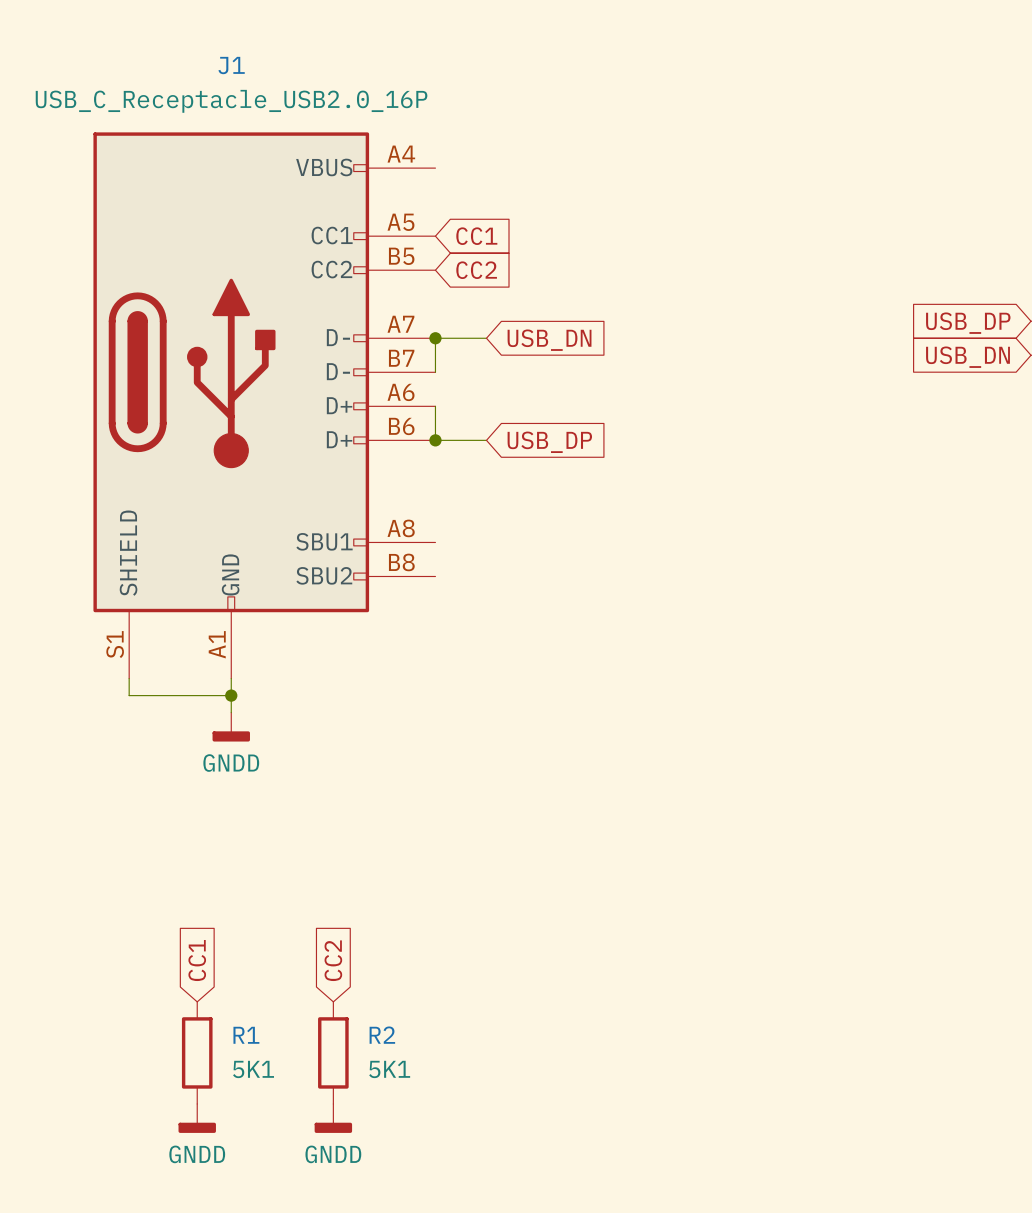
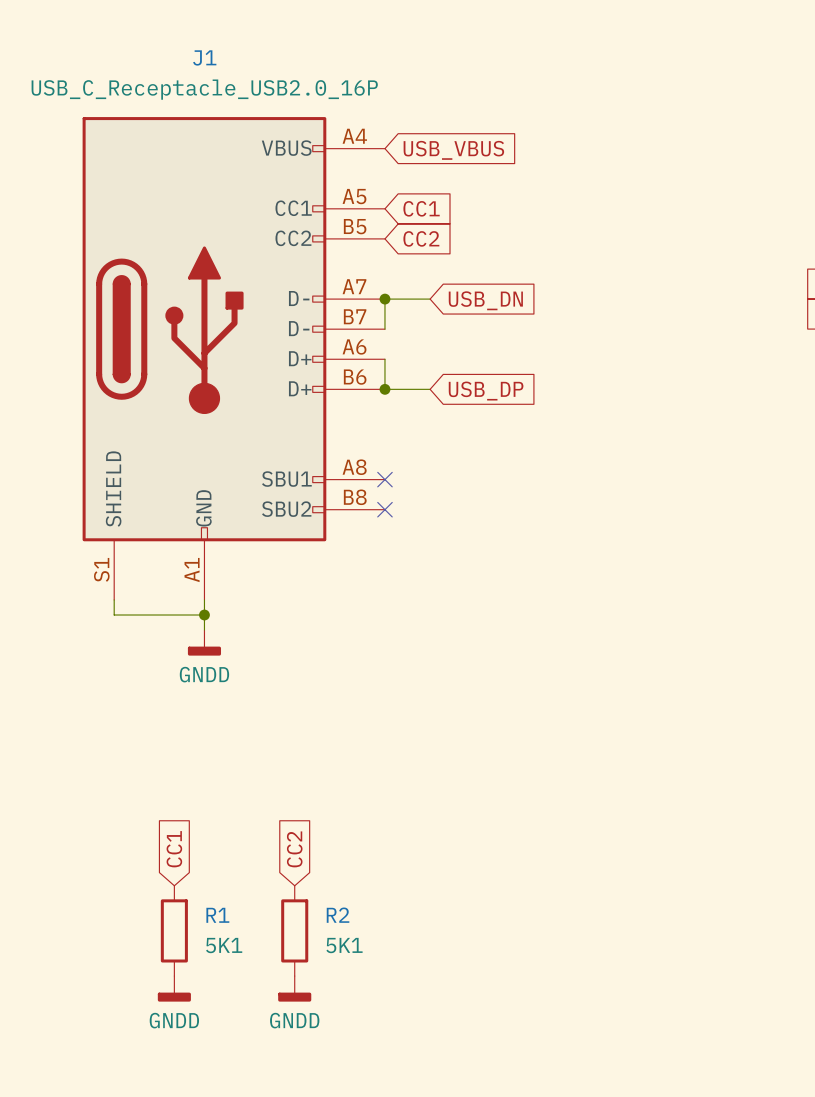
global label: none -> USB_VBUS (453, 150)
no-connect mark: none -> (384, 479)
no-connect mark: none -> (384, 509)

